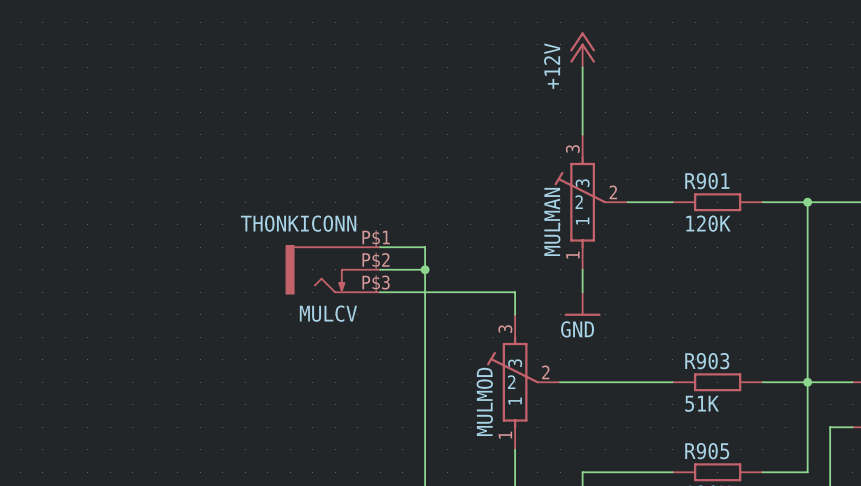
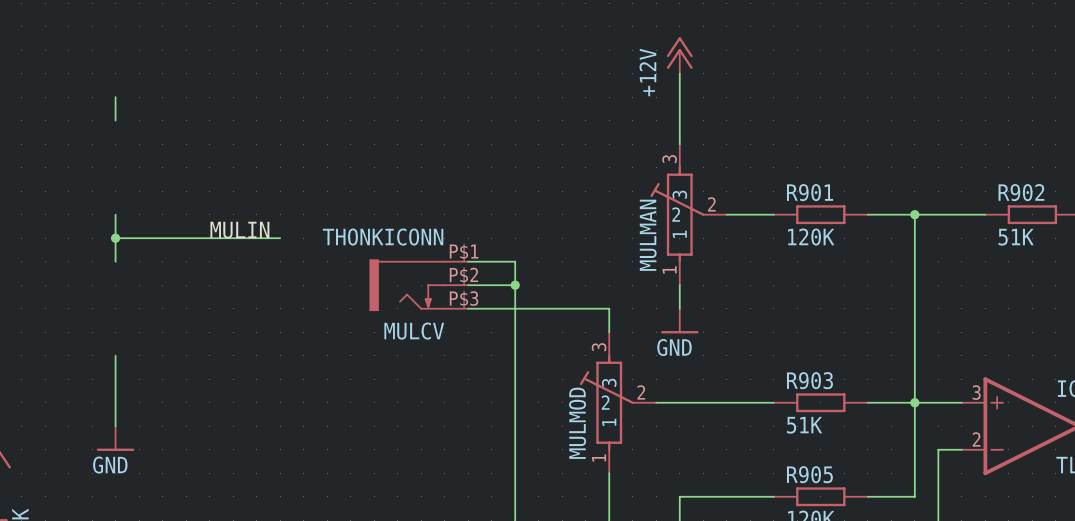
wire: none -> (115, 97) (115, 120)
wire: none -> (115, 214) (115, 261)
label: none -> MULIN (239, 230)
wire: none -> (115, 238) (280, 238)
junction: none -> (115, 238)
wire: none -> (115, 355) (115, 426)
power symbol: none -> GND (115, 438)

